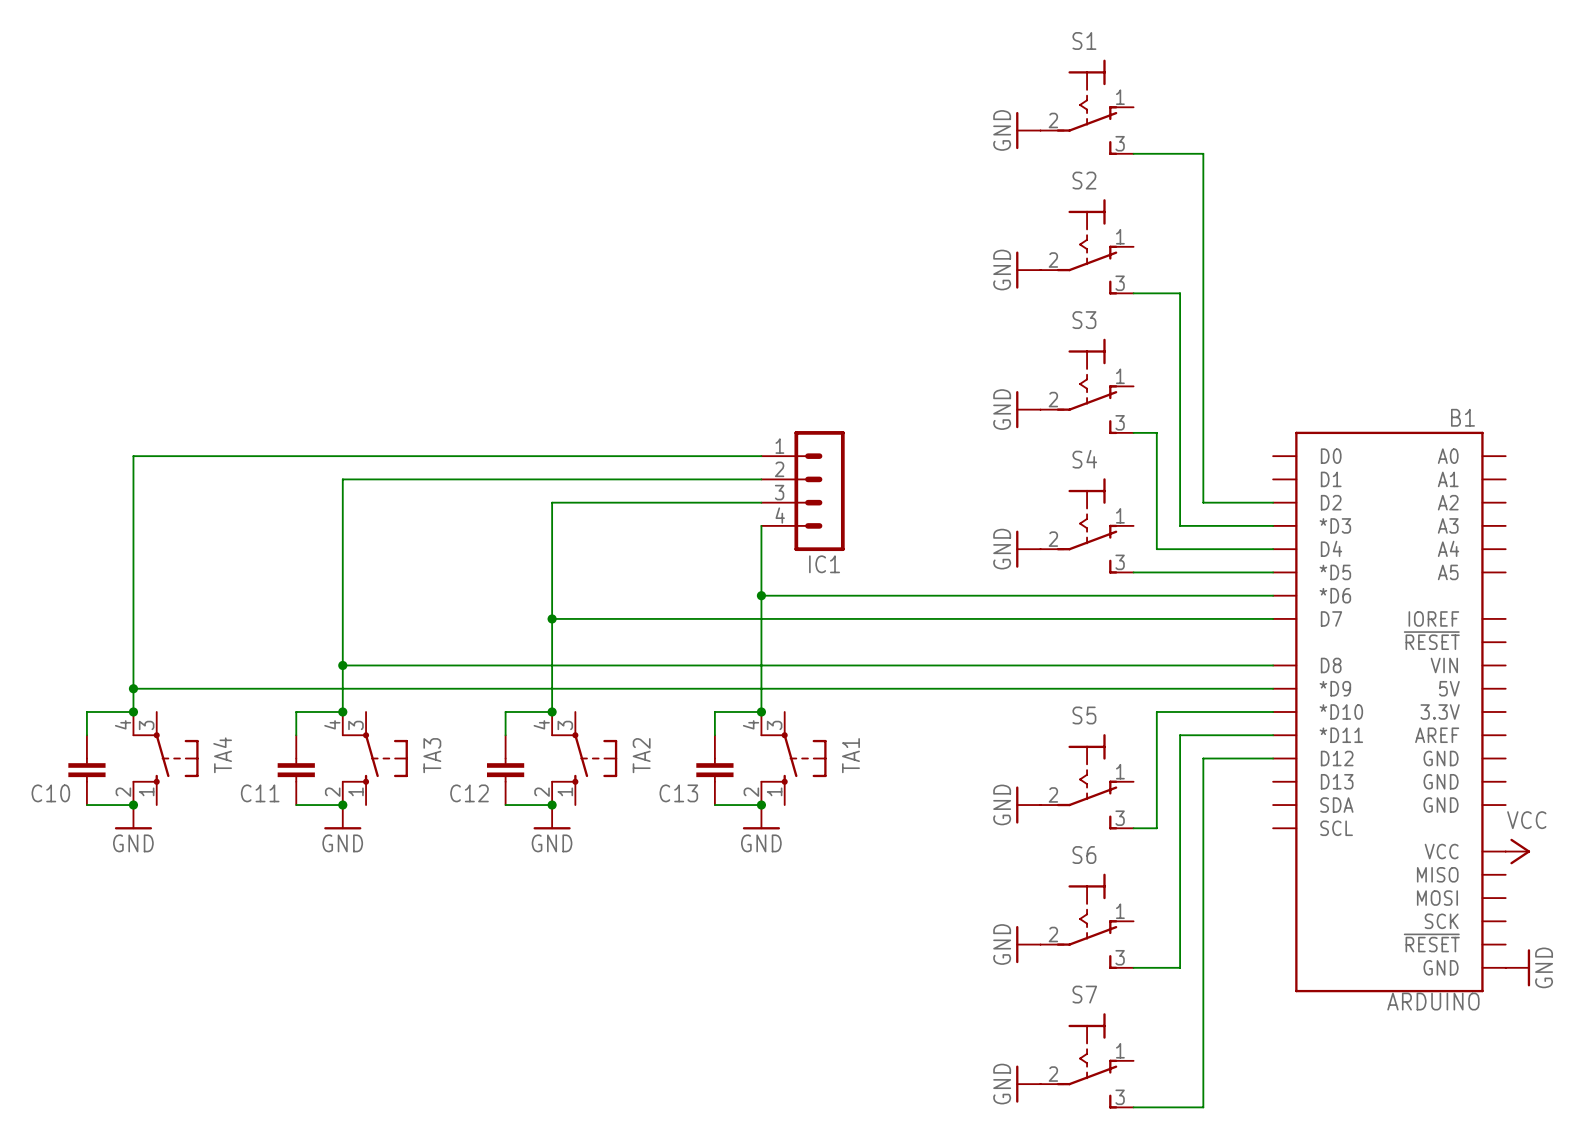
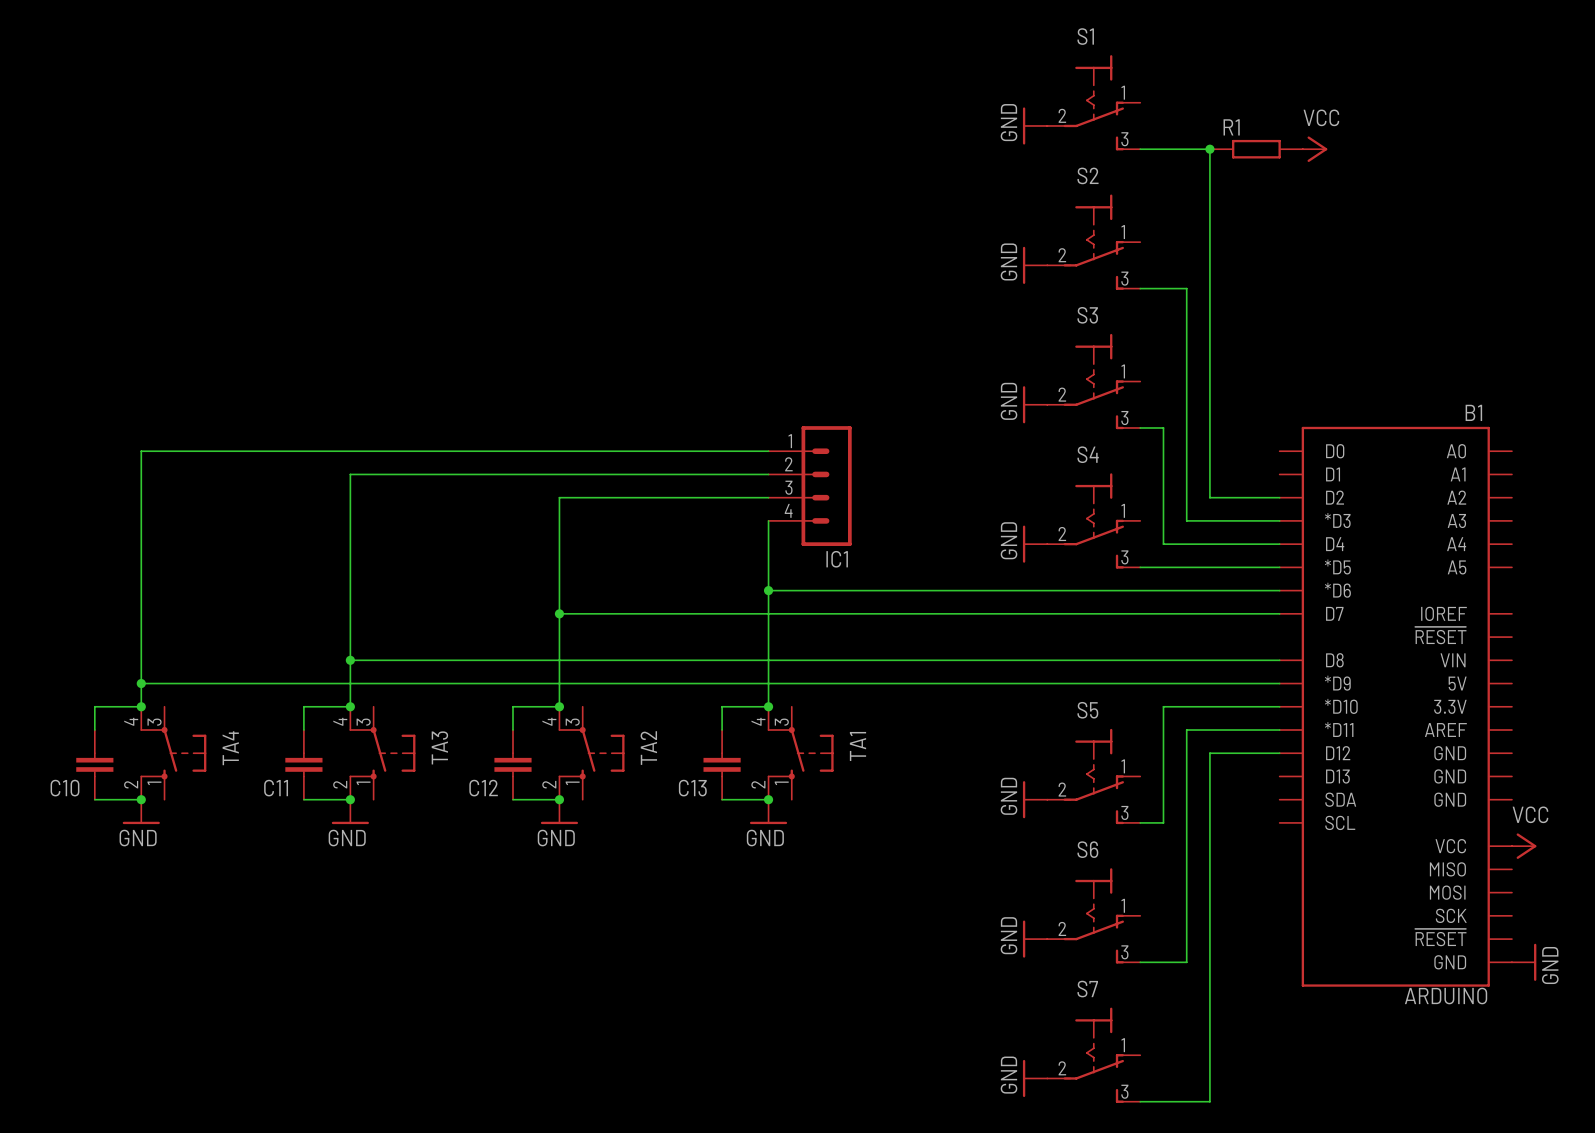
junction: none -> (1209, 149)
R1: none -> (1256, 149)
power symbol: none -> VCC (1315, 149)

